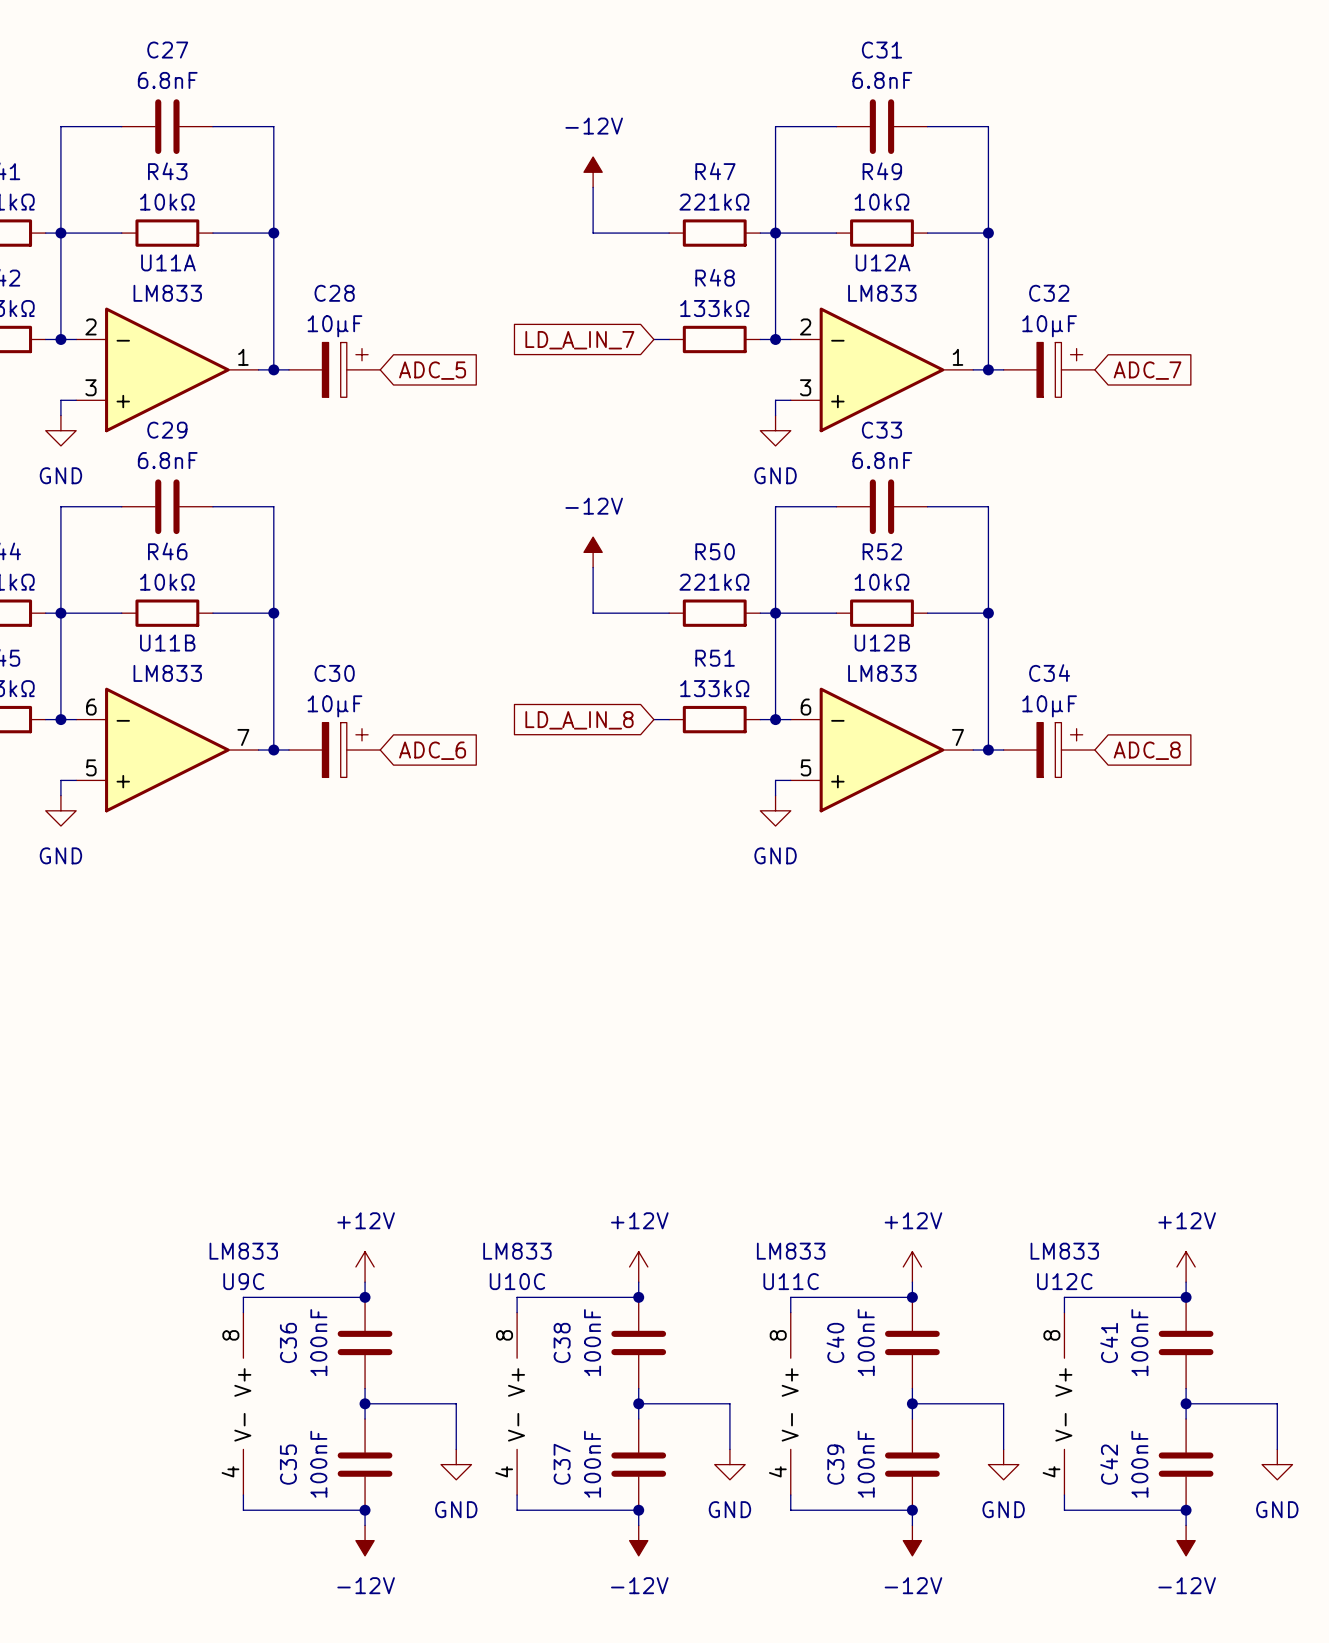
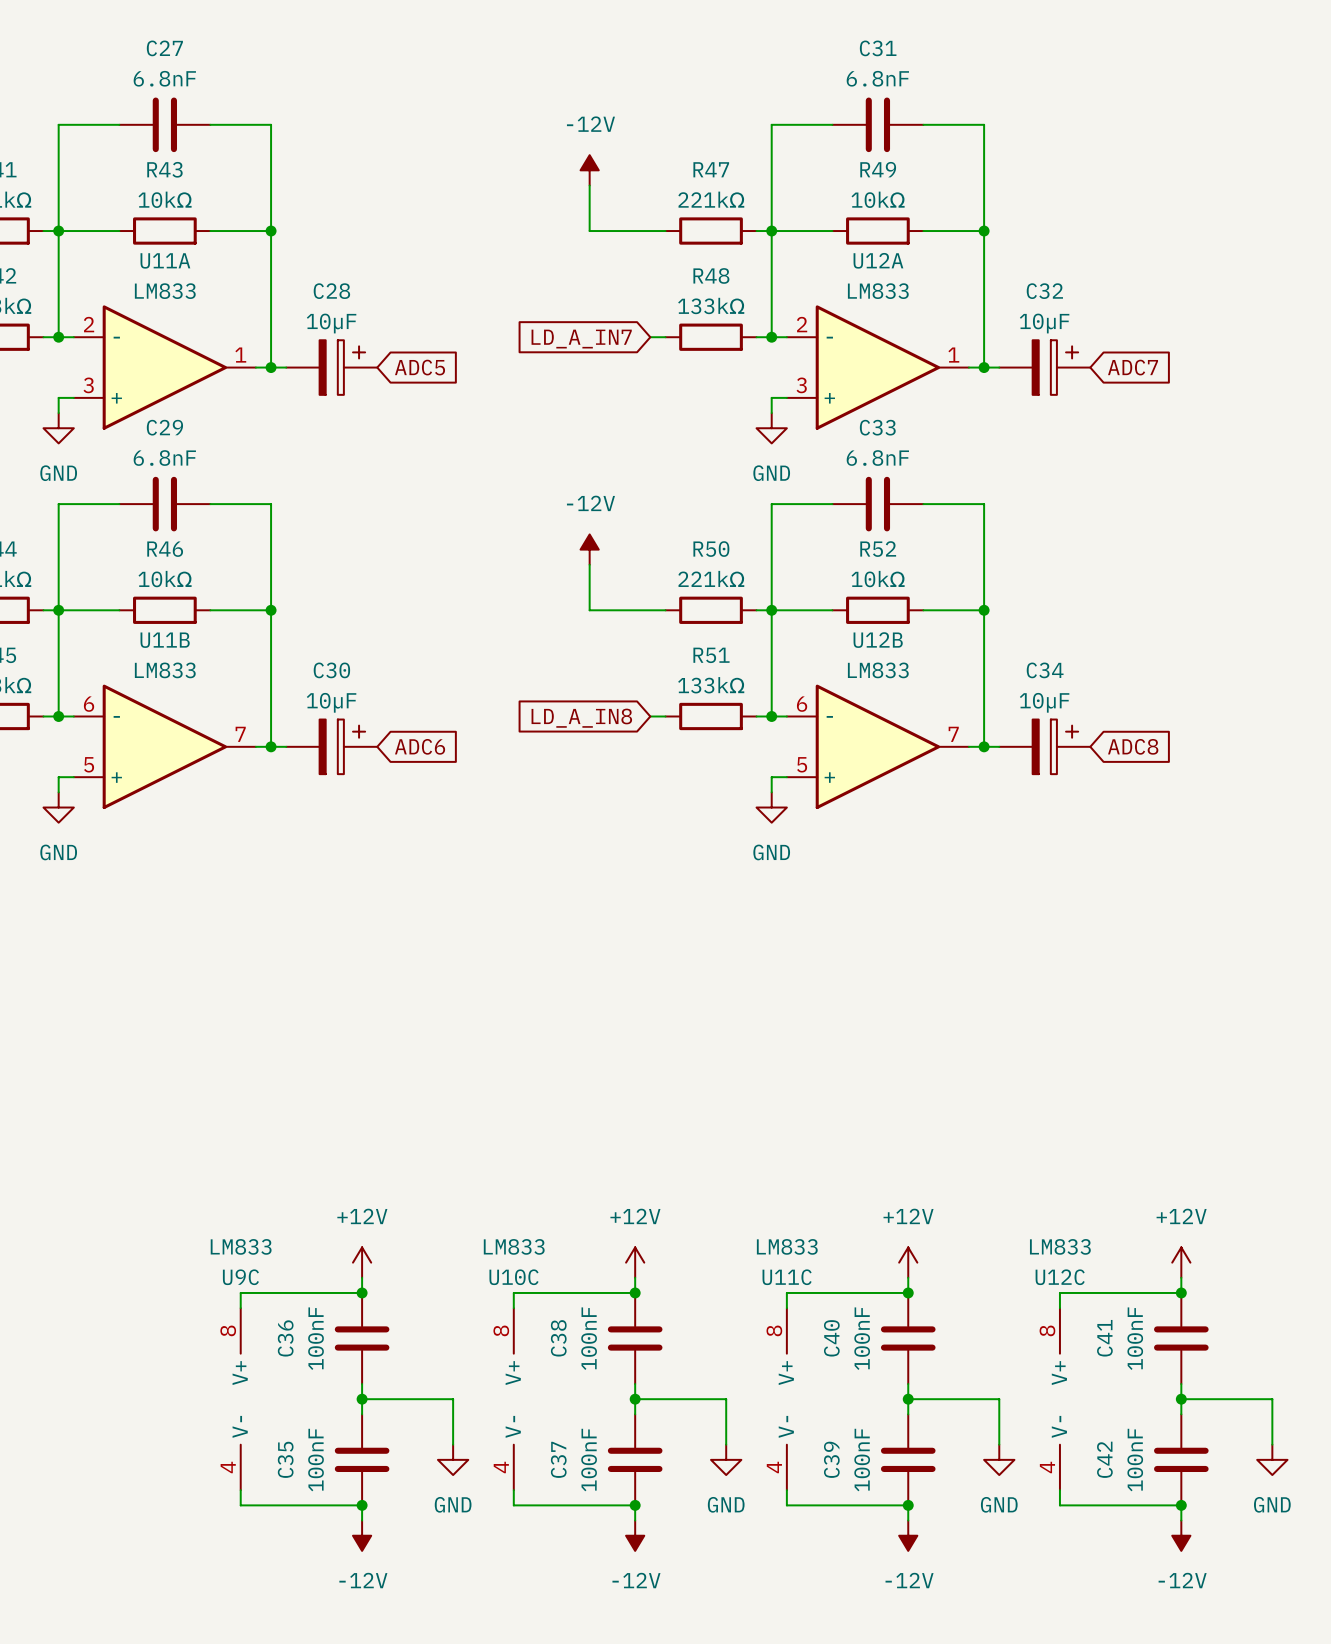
global label: LD_A_IN_7 (579, 340) -> LD_A_IN7 (581, 339)
global label: ADC_5 (432, 370) -> ADC5 (420, 367)
global label: ADC_7 (1147, 370) -> ADC7 (1133, 367)
global label: LD_A_IN_8 (579, 720) -> LD_A_IN8 (581, 718)
global label: ADC_6 (432, 750) -> ADC6 (420, 746)
global label: ADC_8 (1147, 750) -> ADC8 (1133, 746)

